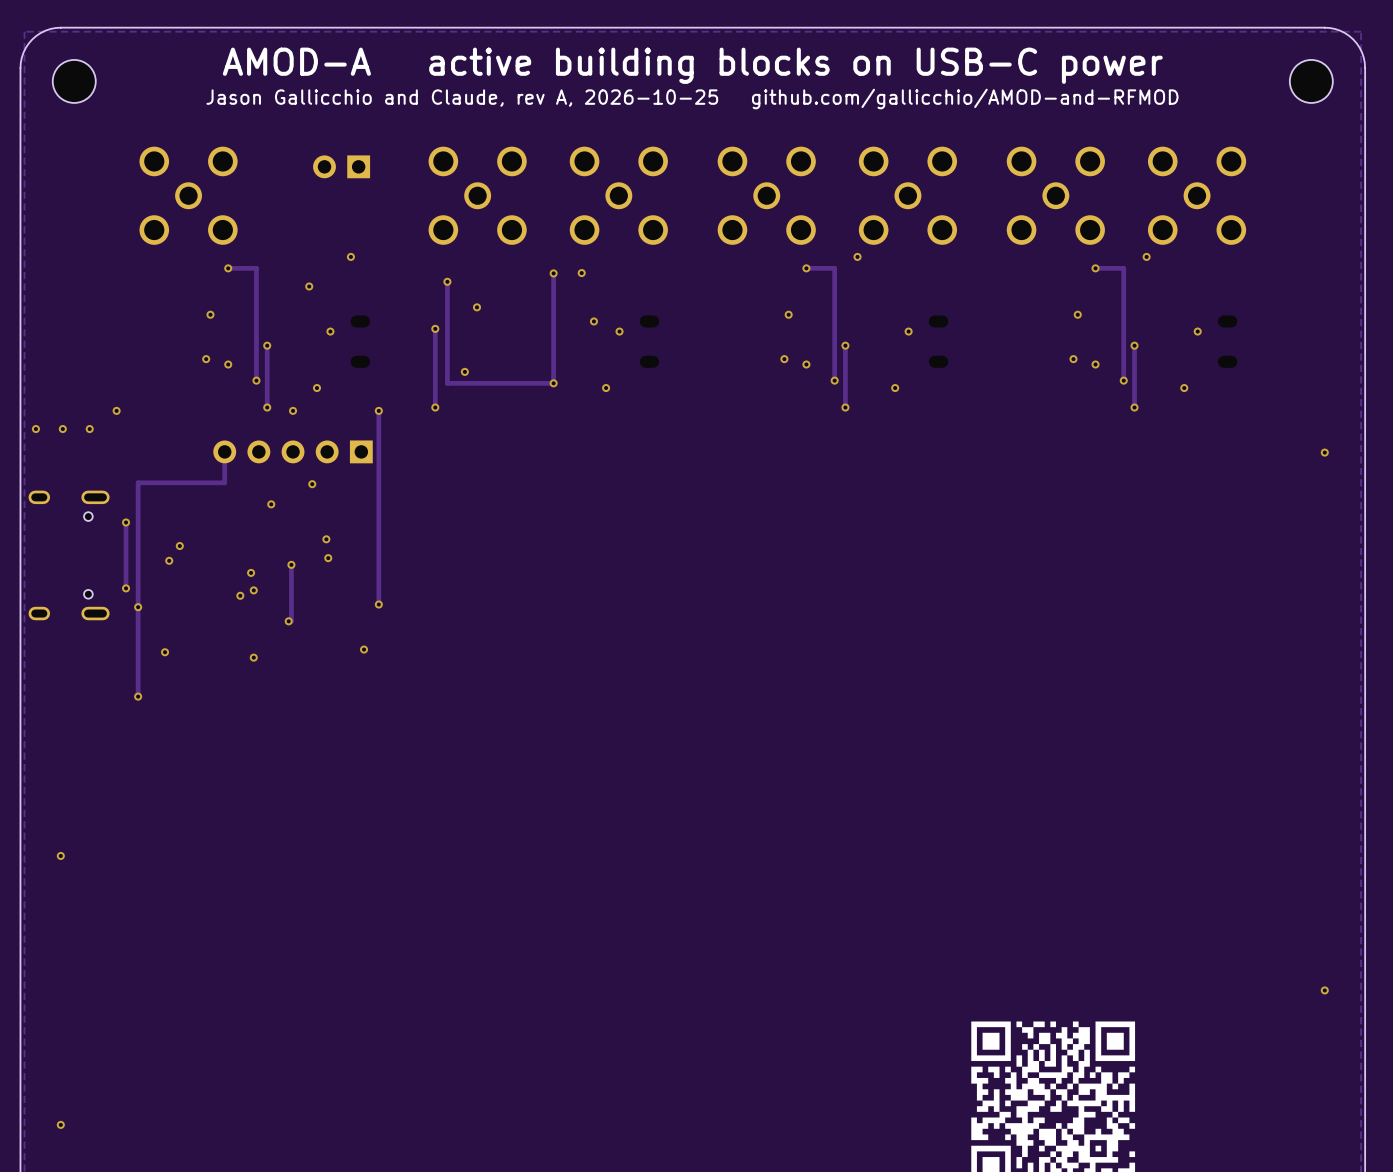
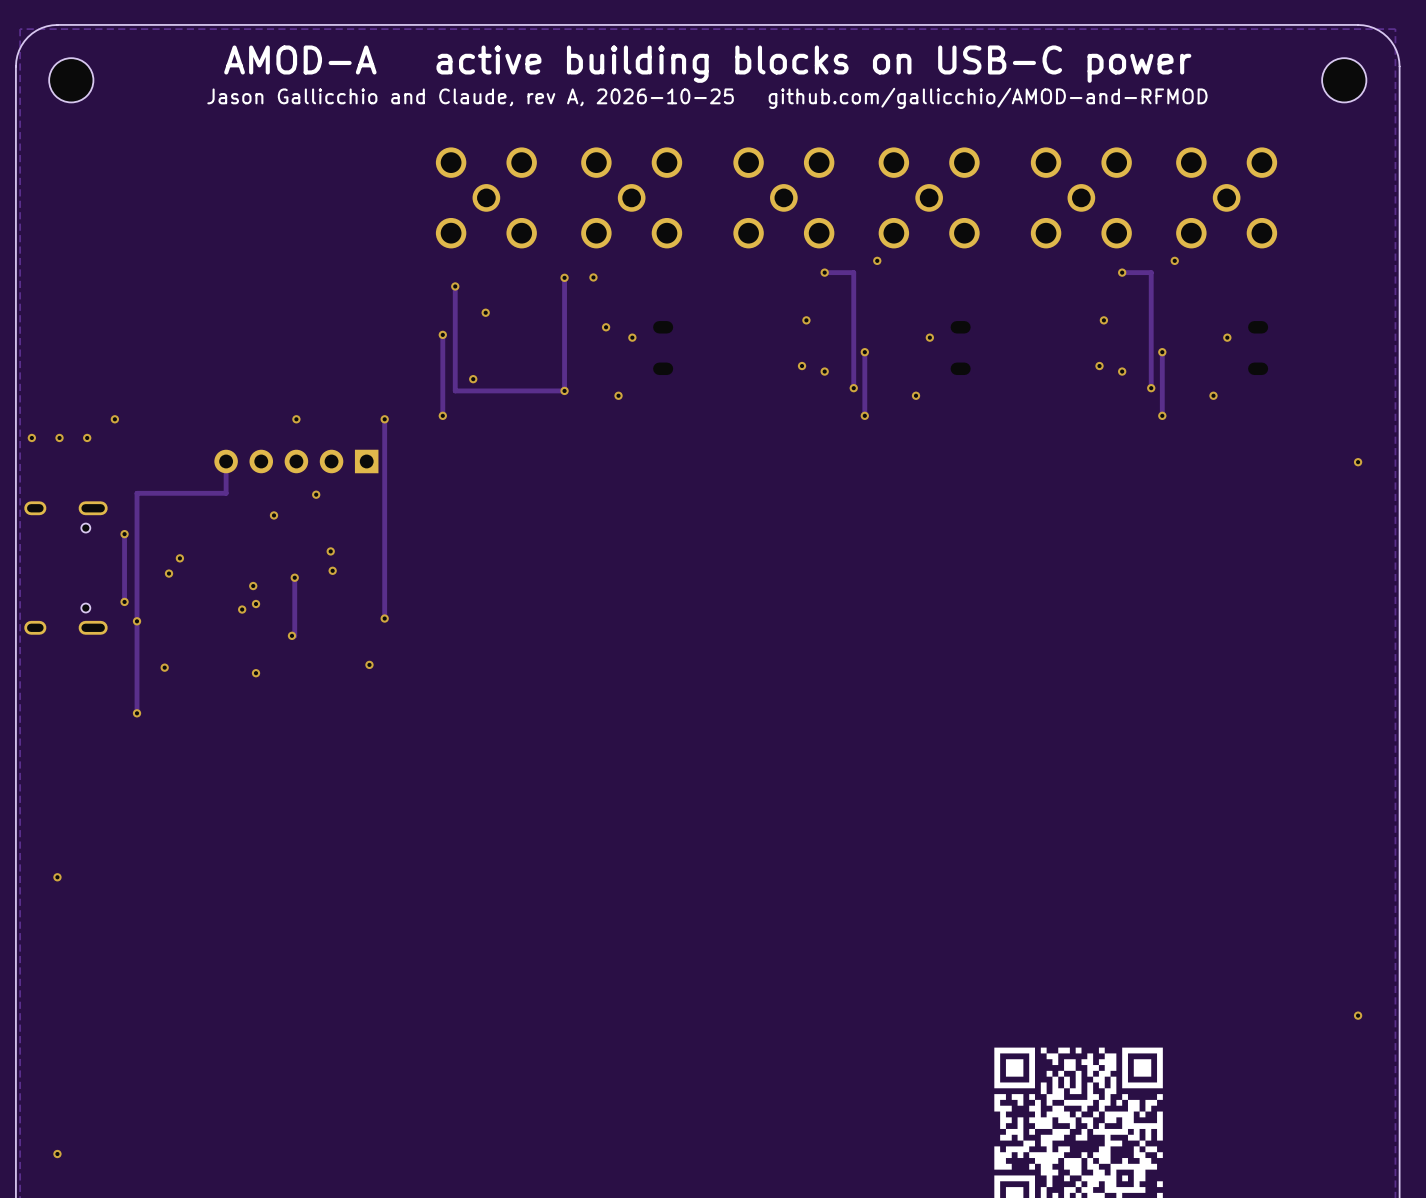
part: (341, 166) -> none
part: (188, 195) -> none
via: (350, 256) -> none
track: (228, 268) (256, 268) (256, 380) -> none
via: (228, 268) -> none
via: (309, 286) -> none
via: (210, 314) -> none
via: (330, 331) -> none
part: (360, 341) -> none
track: (267, 345) (267, 407) -> none
via: (267, 345) -> none
via: (206, 359) -> none
via: (228, 364) -> none
via: (256, 380) -> none
via: (316, 388) -> none
via: (267, 407) -> none

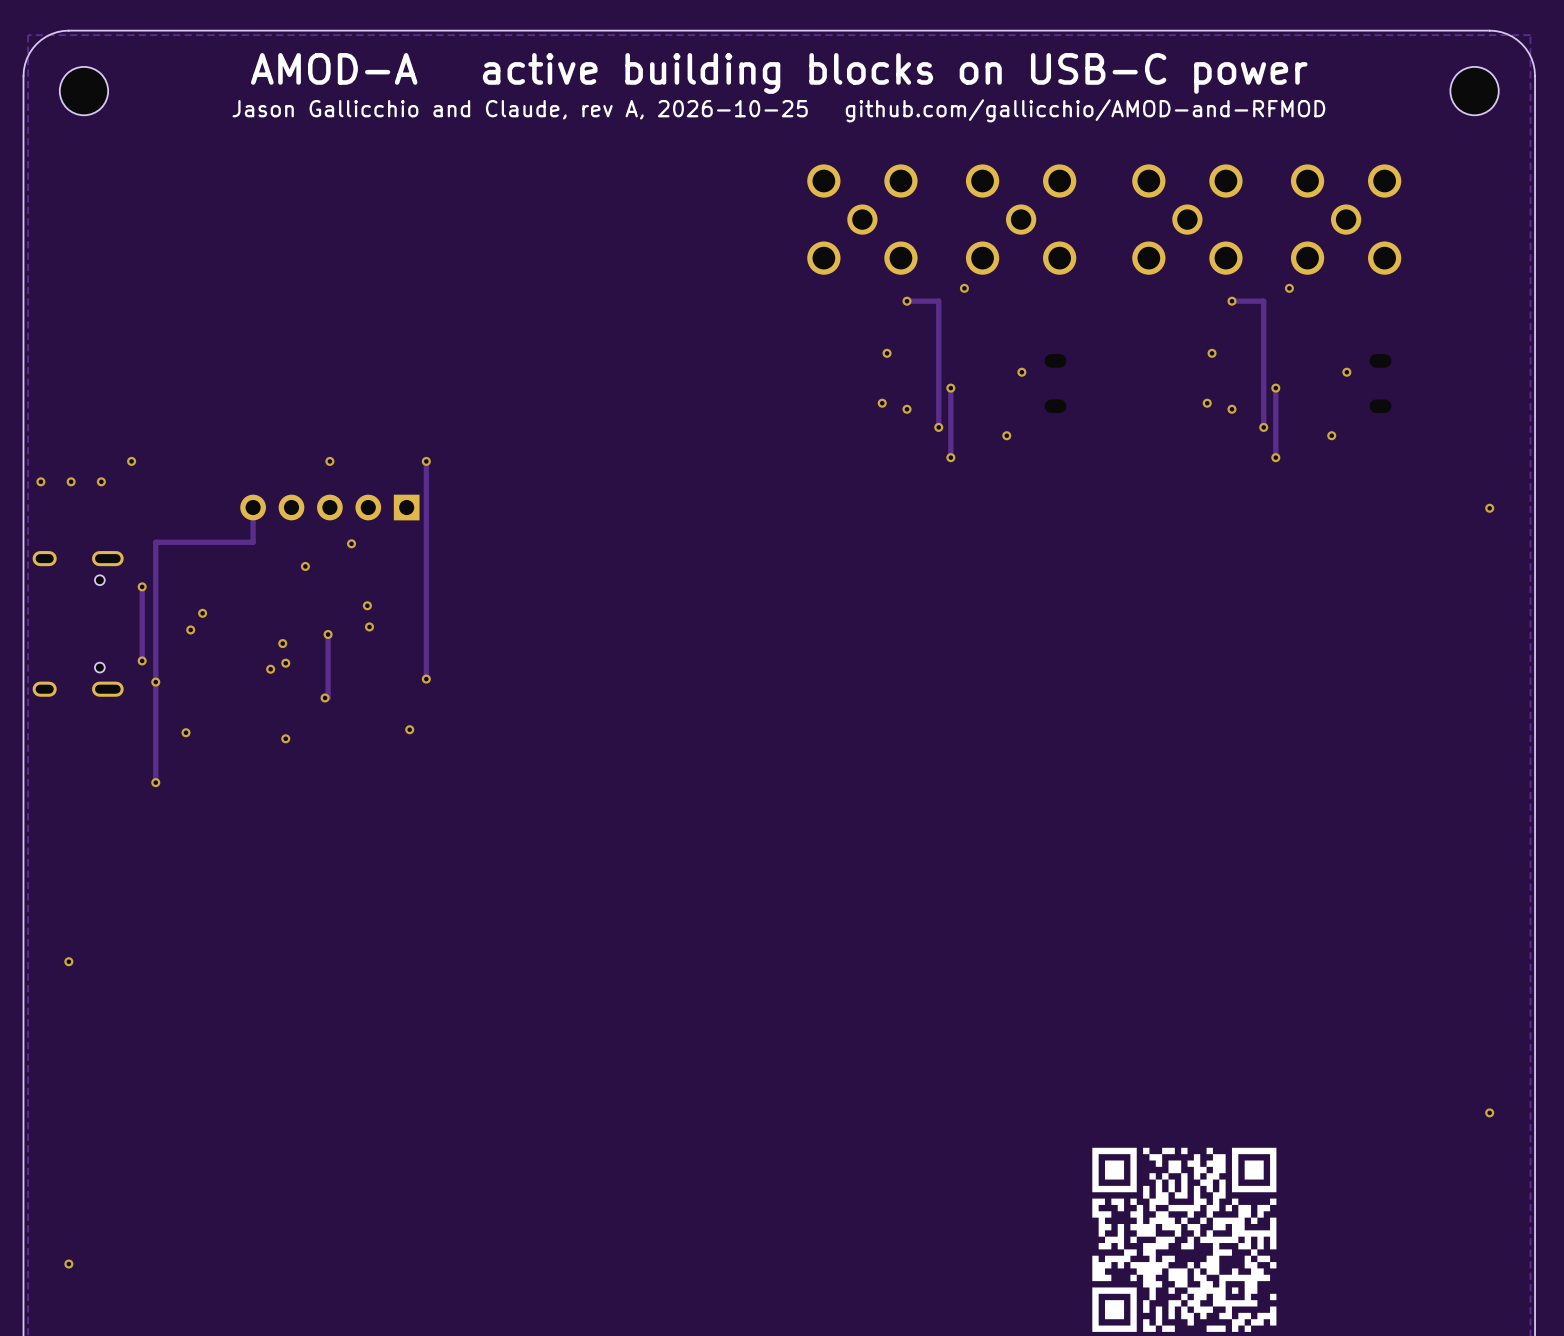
part: (486, 197) -> none
part: (631, 197) -> none
track: (564, 277) (564, 390) (455, 390) (455, 286) -> none
via: (564, 277) -> none
via: (593, 277) -> none
via: (455, 286) -> none
via: (485, 312) -> none
via: (606, 327) -> none
track: (442, 334) (442, 415) -> none
via: (442, 334) -> none
via: (632, 337) -> none
part: (663, 348) -> none
via: (473, 379) -> none
via: (564, 390) -> none
via: (618, 395) -> none
via: (442, 415) -> none

